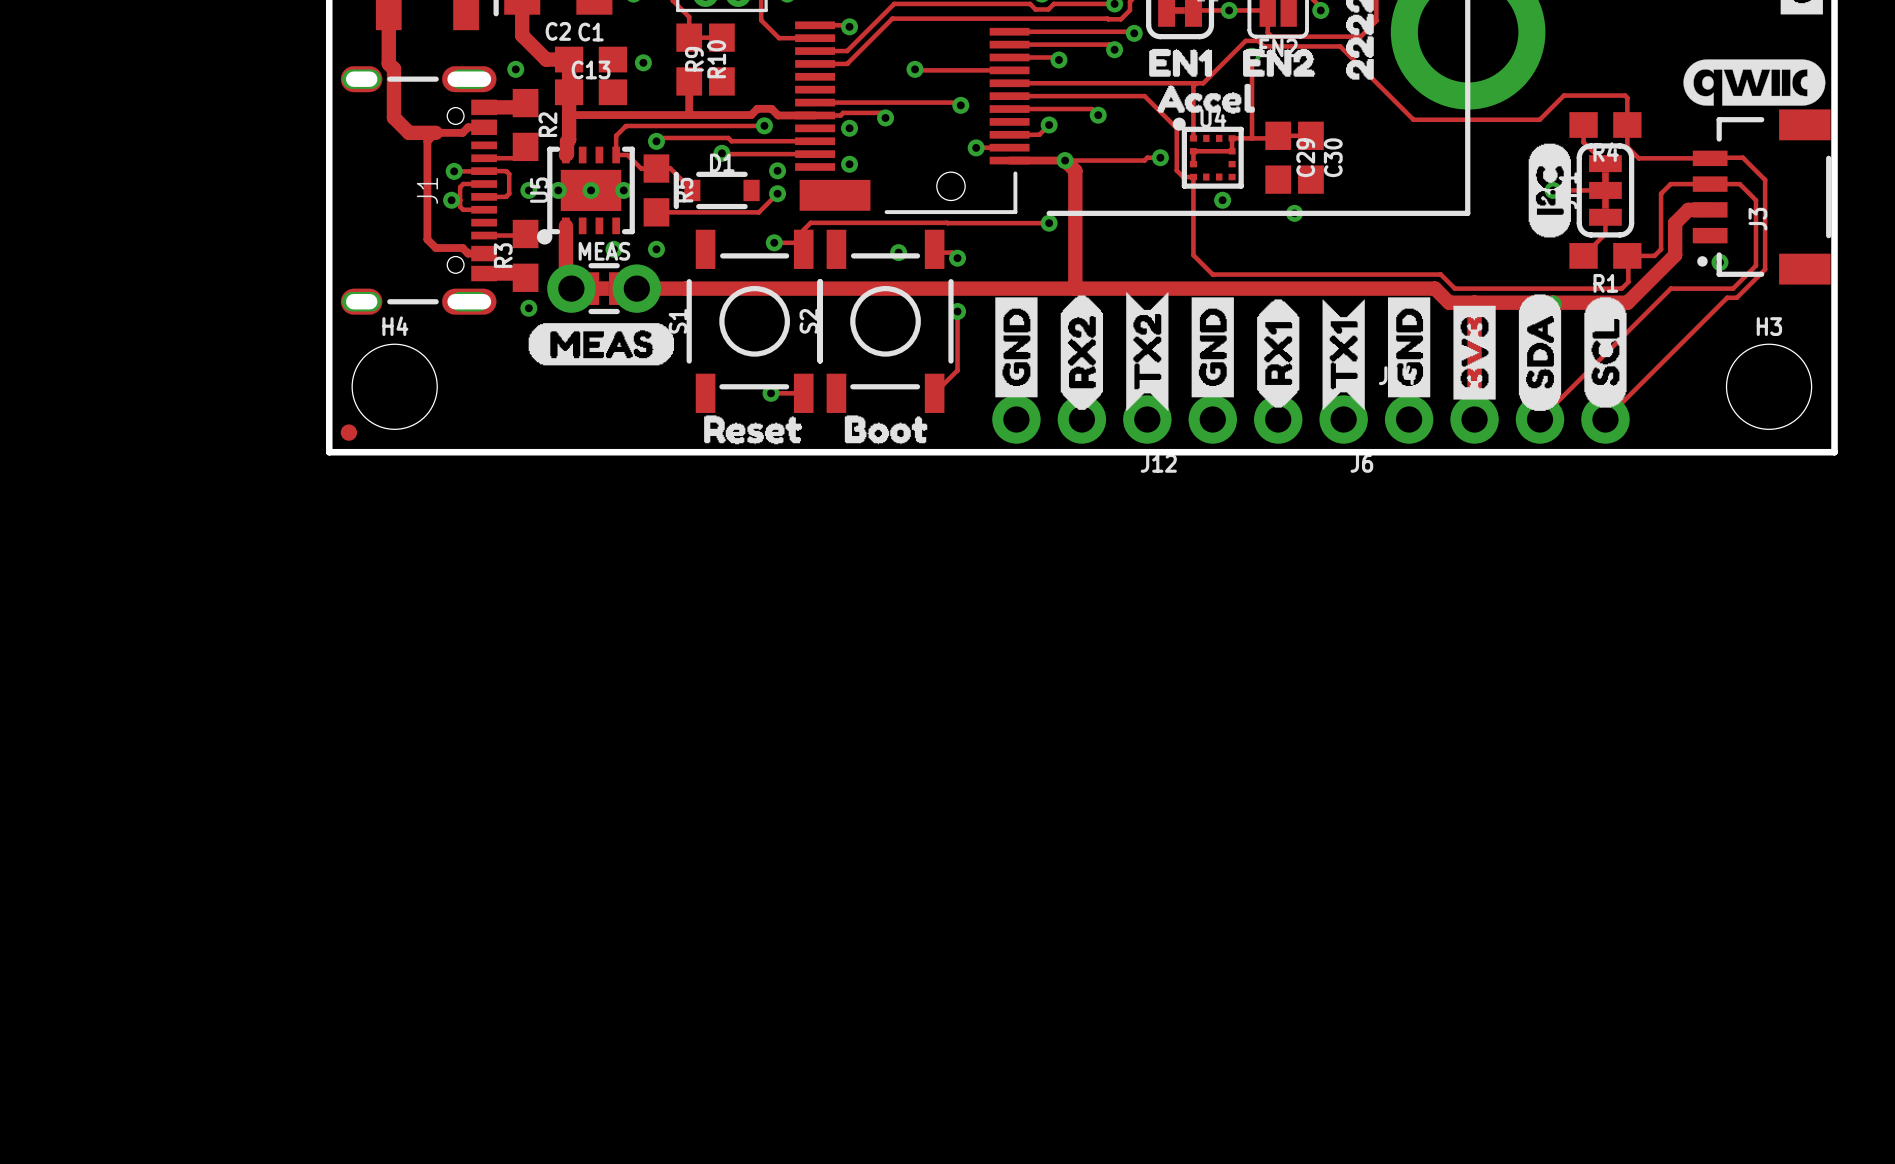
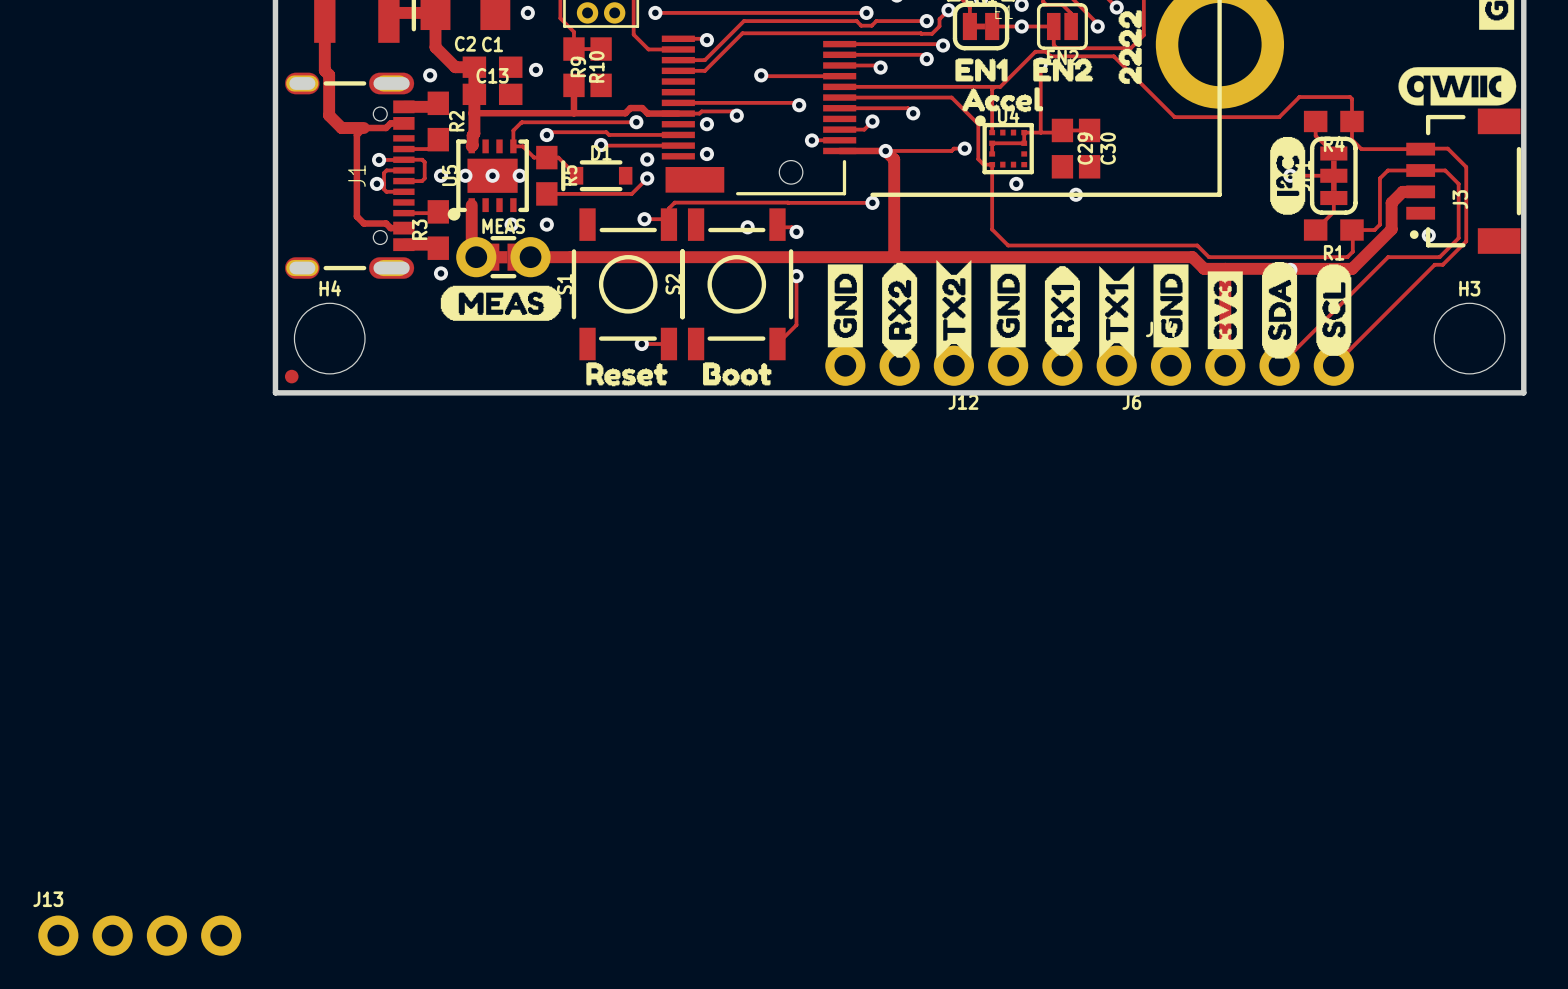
J13: none -> (139, 935)

